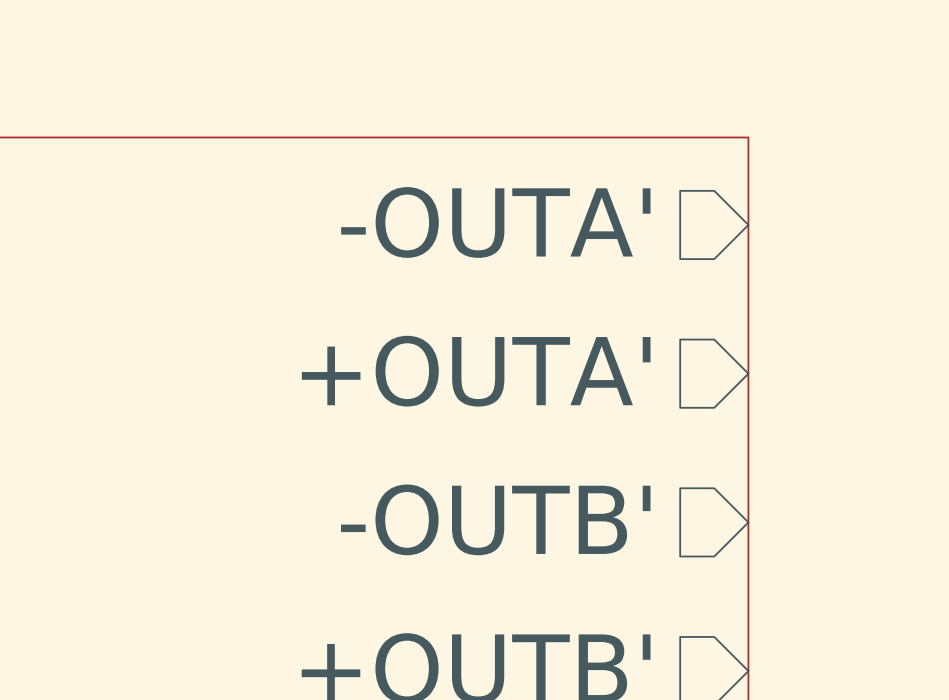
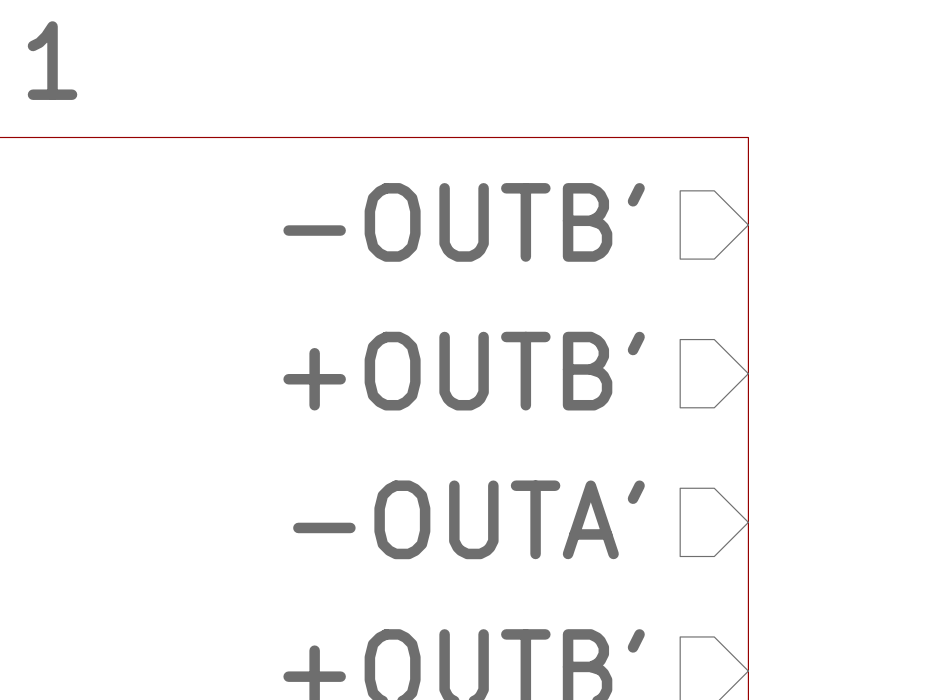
sheet pin: -OUTA' (495, 222) -> -OUTB' (464, 222)
sheet pin: +OUTA' (476, 371) -> +OUTB' (464, 371)
sheet pin: -OUTB' (495, 519) -> -OUTA' (468, 519)

